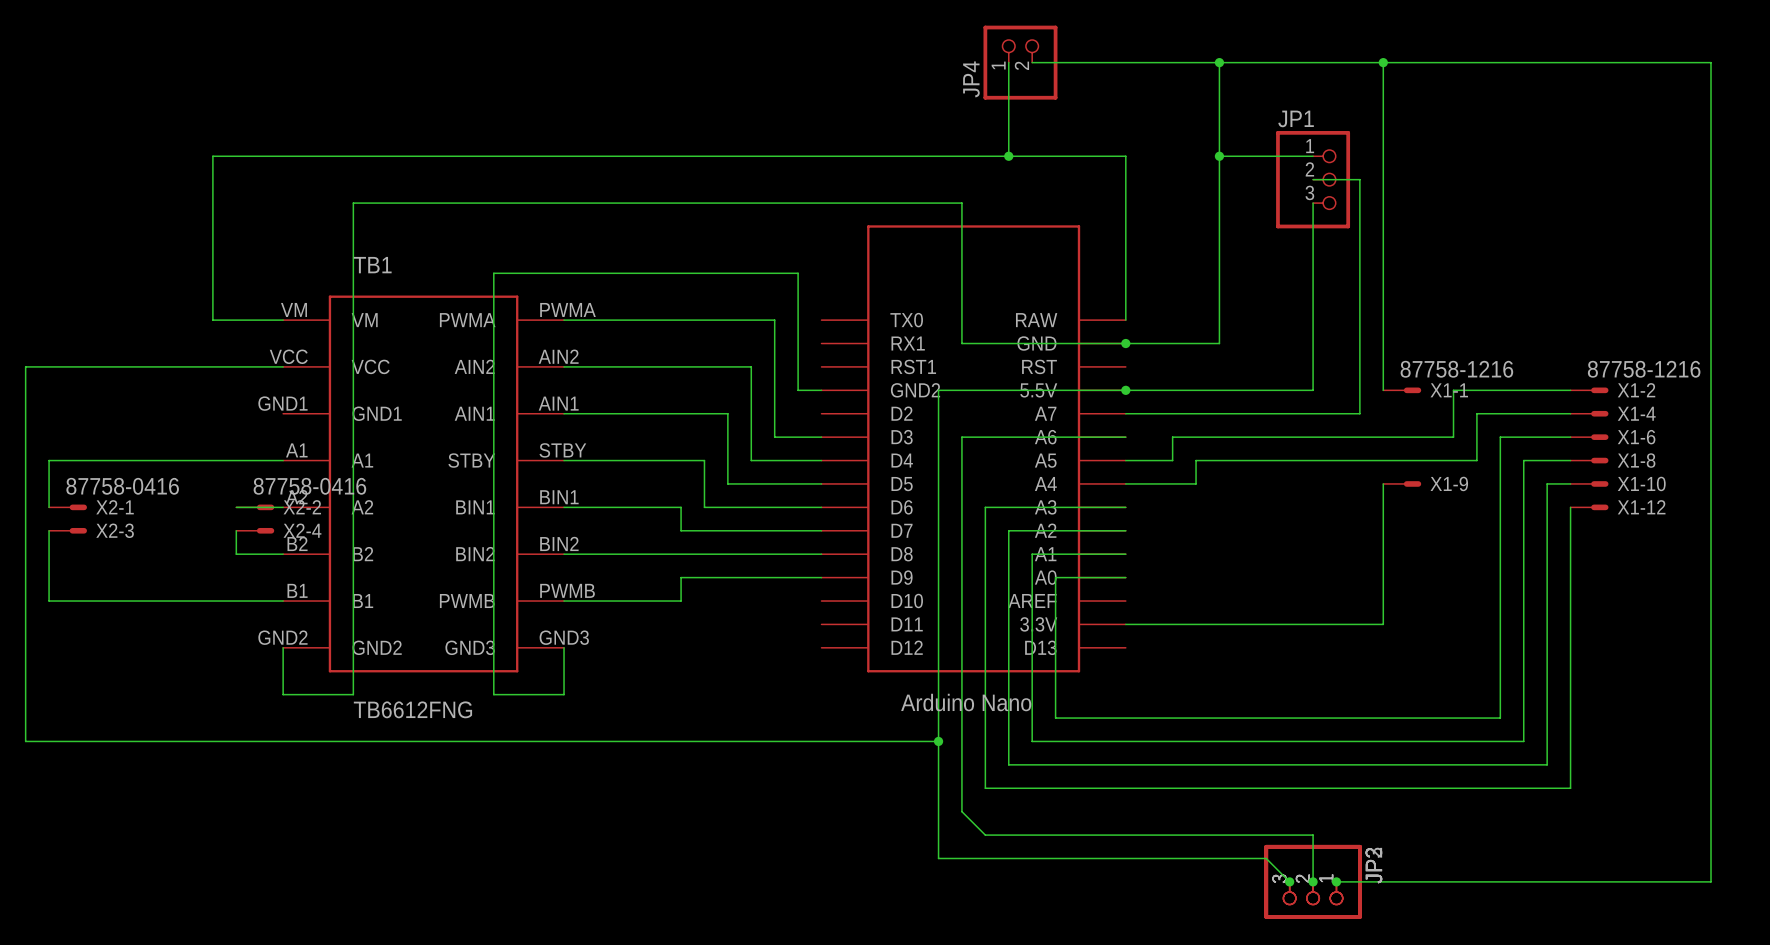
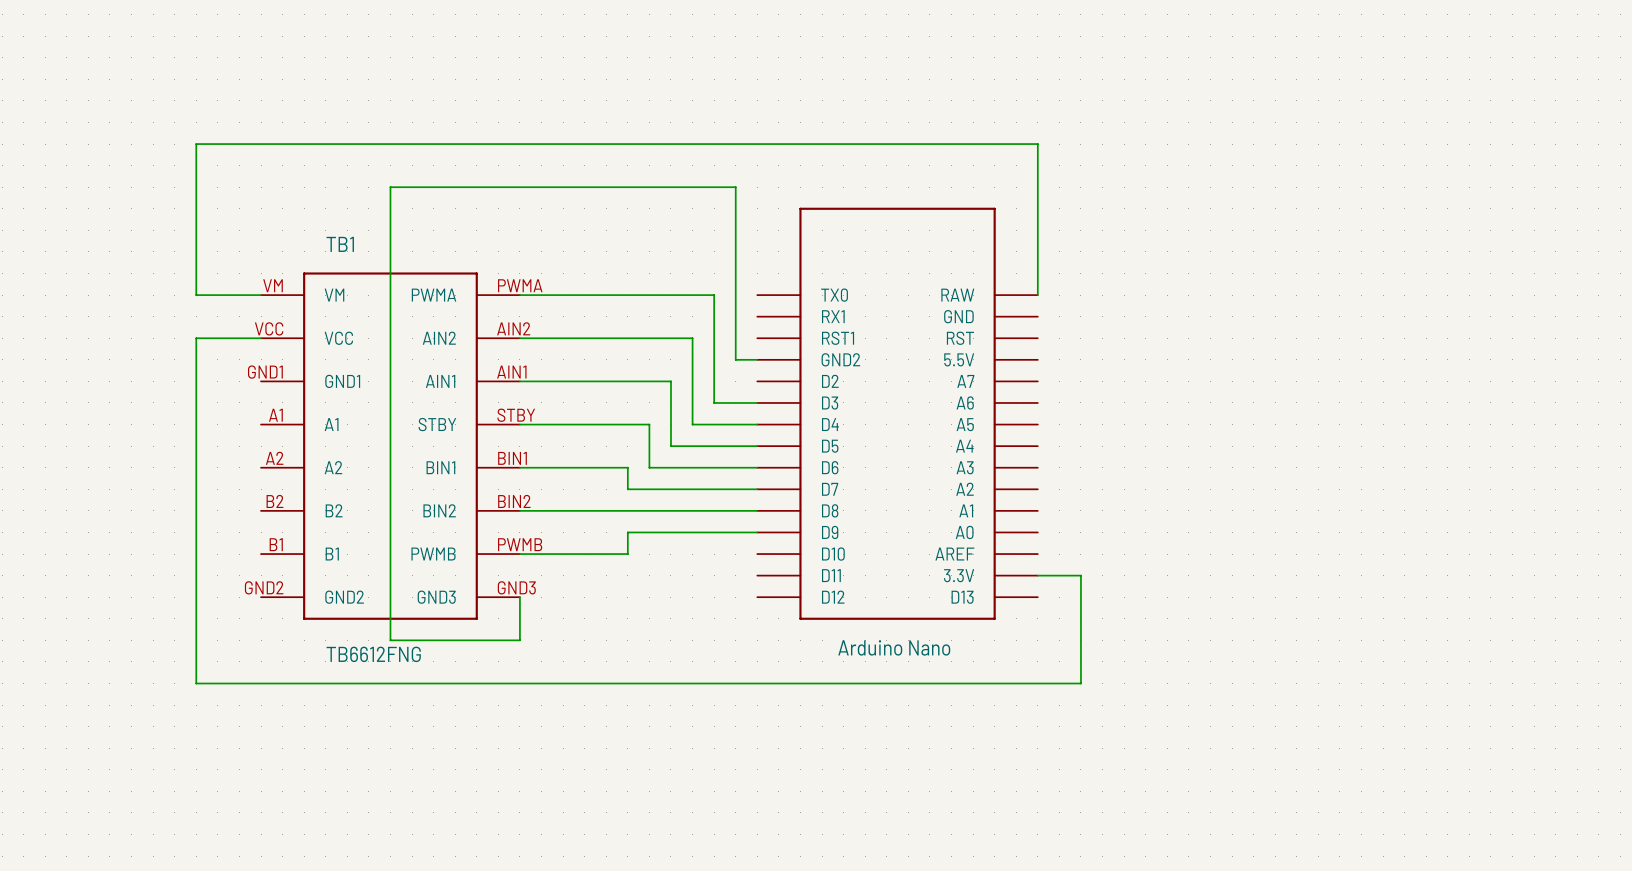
wire: (1008, 62) (1008, 156) -> none
JP4: (1020, 62) -> none
wire: (1032, 62) (1711, 62) (1711, 881) (1336, 881) -> none
wire: (1219, 62) (1219, 343) (961, 343) (961, 203) (798, 203) -> (735, 251) (735, 187)
junction: (1219, 62) -> none
wire: (1383, 62) (1383, 390) -> none
junction: (1383, 62) -> none
junction: (1008, 156) -> none
wire: (1219, 156) (1313, 156) -> none
junction: (1219, 156) -> none
wire: (1313, 179) (1359, 179) (1359, 413) (1125, 413) -> none
JP1: (1313, 179) -> none
wire: (423, 203) (353, 203) (353, 694) (283, 694) (283, 647) -> (390, 187) (390, 640) (455, 640)
wire: (1313, 203) (1313, 390) (938, 390) (938, 858) (1266, 858) (1289, 881) -> none
wire: (798, 273) (493, 273) (493, 694) -> none
junction: (1125, 343) -> none
wire: (212, 366) (25, 366) (25, 741) (212, 741) -> (196, 338) (196, 683)
junction: (1125, 390) -> none
X1-1: 87758-1216 (1402, 390) -> none
wire: (1570, 390) (1453, 390) (1453, 437) (1172, 437) (1172, 460) (1125, 460) -> none
X1-2: 87758-1216 (1589, 390) -> none
wire: (1570, 413) (1476, 413) (1476, 460) (1196, 460) (1196, 483) (1125, 483) -> none
X1-4: (1589, 413) -> none
wire: (1125, 437) (961, 437) (961, 811) (985, 835) (1313, 835) (1313, 881) -> none
wire: (1570, 437) (1500, 437) (1500, 718) (1055, 718) (1055, 577) (1125, 577) -> none
X1-6: (1589, 437) -> none
wire: (283, 460) (49, 460) (49, 507) -> none
wire: (1570, 460) (1523, 460) (1523, 741) (1172, 741) -> none
X1-8: (1589, 460) -> none
wire: (1383, 483) (1383, 624) (1172, 624) -> (1080, 683) (1080, 575)
X1-9: (1402, 483) -> none
wire: (1570, 483) (1547, 483) (1547, 764) (1008, 764) (1008, 530) (1125, 530) -> none
X1-10: (1589, 483) -> none
X2-1: 87758-0416 (68, 507) -> none
wire: (236, 507) (283, 507) -> none
X2-2: 87758-0416 (255, 507) -> none
wire: (1125, 507) (985, 507) (985, 788) (1570, 788) (1570, 507) -> none
X1-12: (1589, 507) -> none
wire: (49, 530) (49, 601) (283, 601) -> none
X2-3: (68, 530) -> none
wire: (236, 530) (236, 554) (283, 554) -> none
X2-4: (255, 530) -> none
wire: (1125, 554) (1032, 554) (1032, 741) -> (865, 683) (951, 683)
junction: (938, 741) -> none
junction: (1289, 881) -> none
part: (1313, 881) -> none
part: (1313, 881) -> none
junction: (1313, 881) -> none
junction: (1336, 881) -> none

